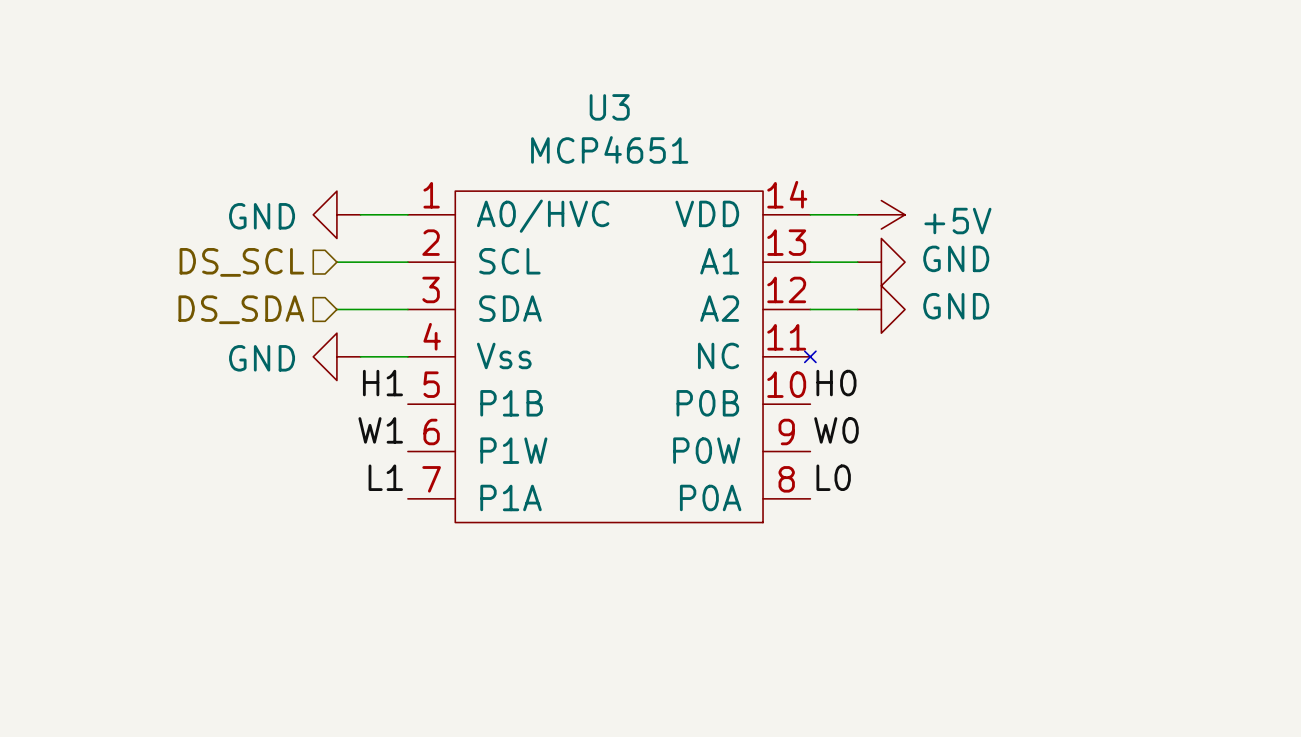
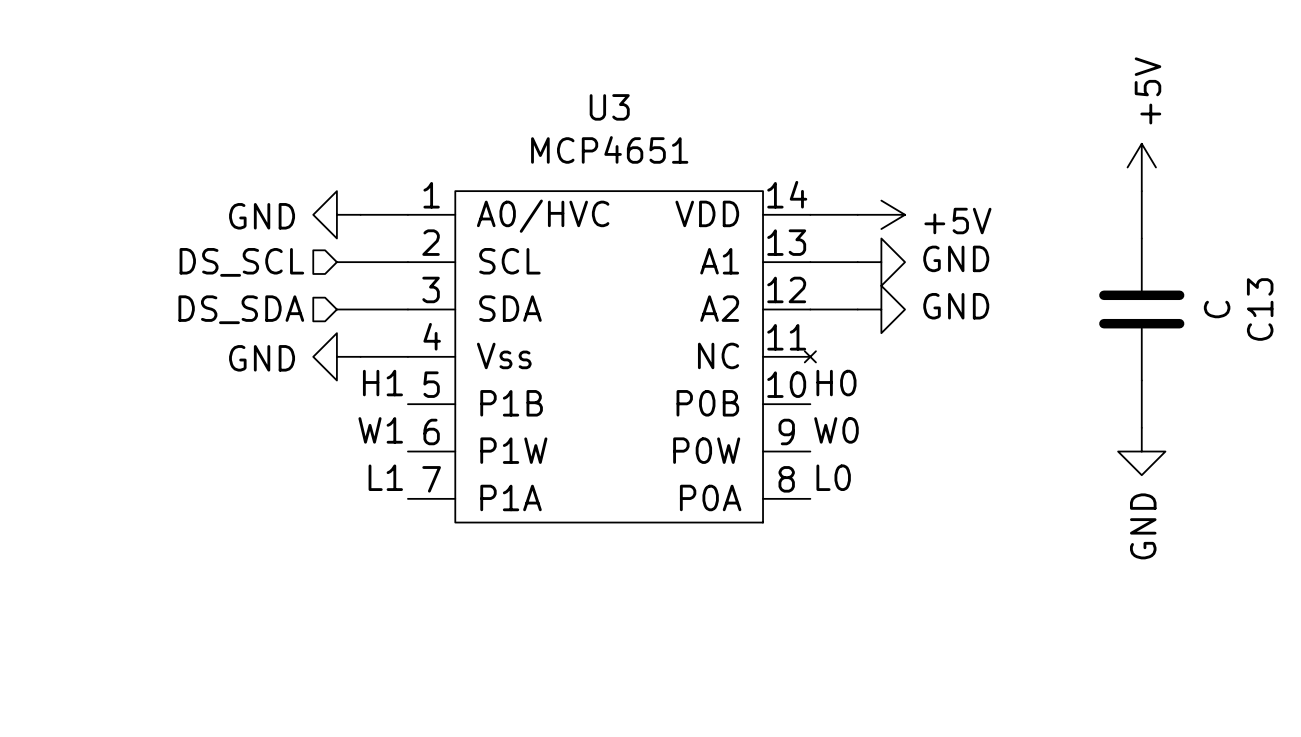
power symbol: none -> +5V (1141, 167)
wire: none -> (1141, 191) (1141, 238)
C13: none -> C (1141, 309)
wire: none -> (1141, 380) (1141, 427)
power symbol: none -> GND (1141, 451)

